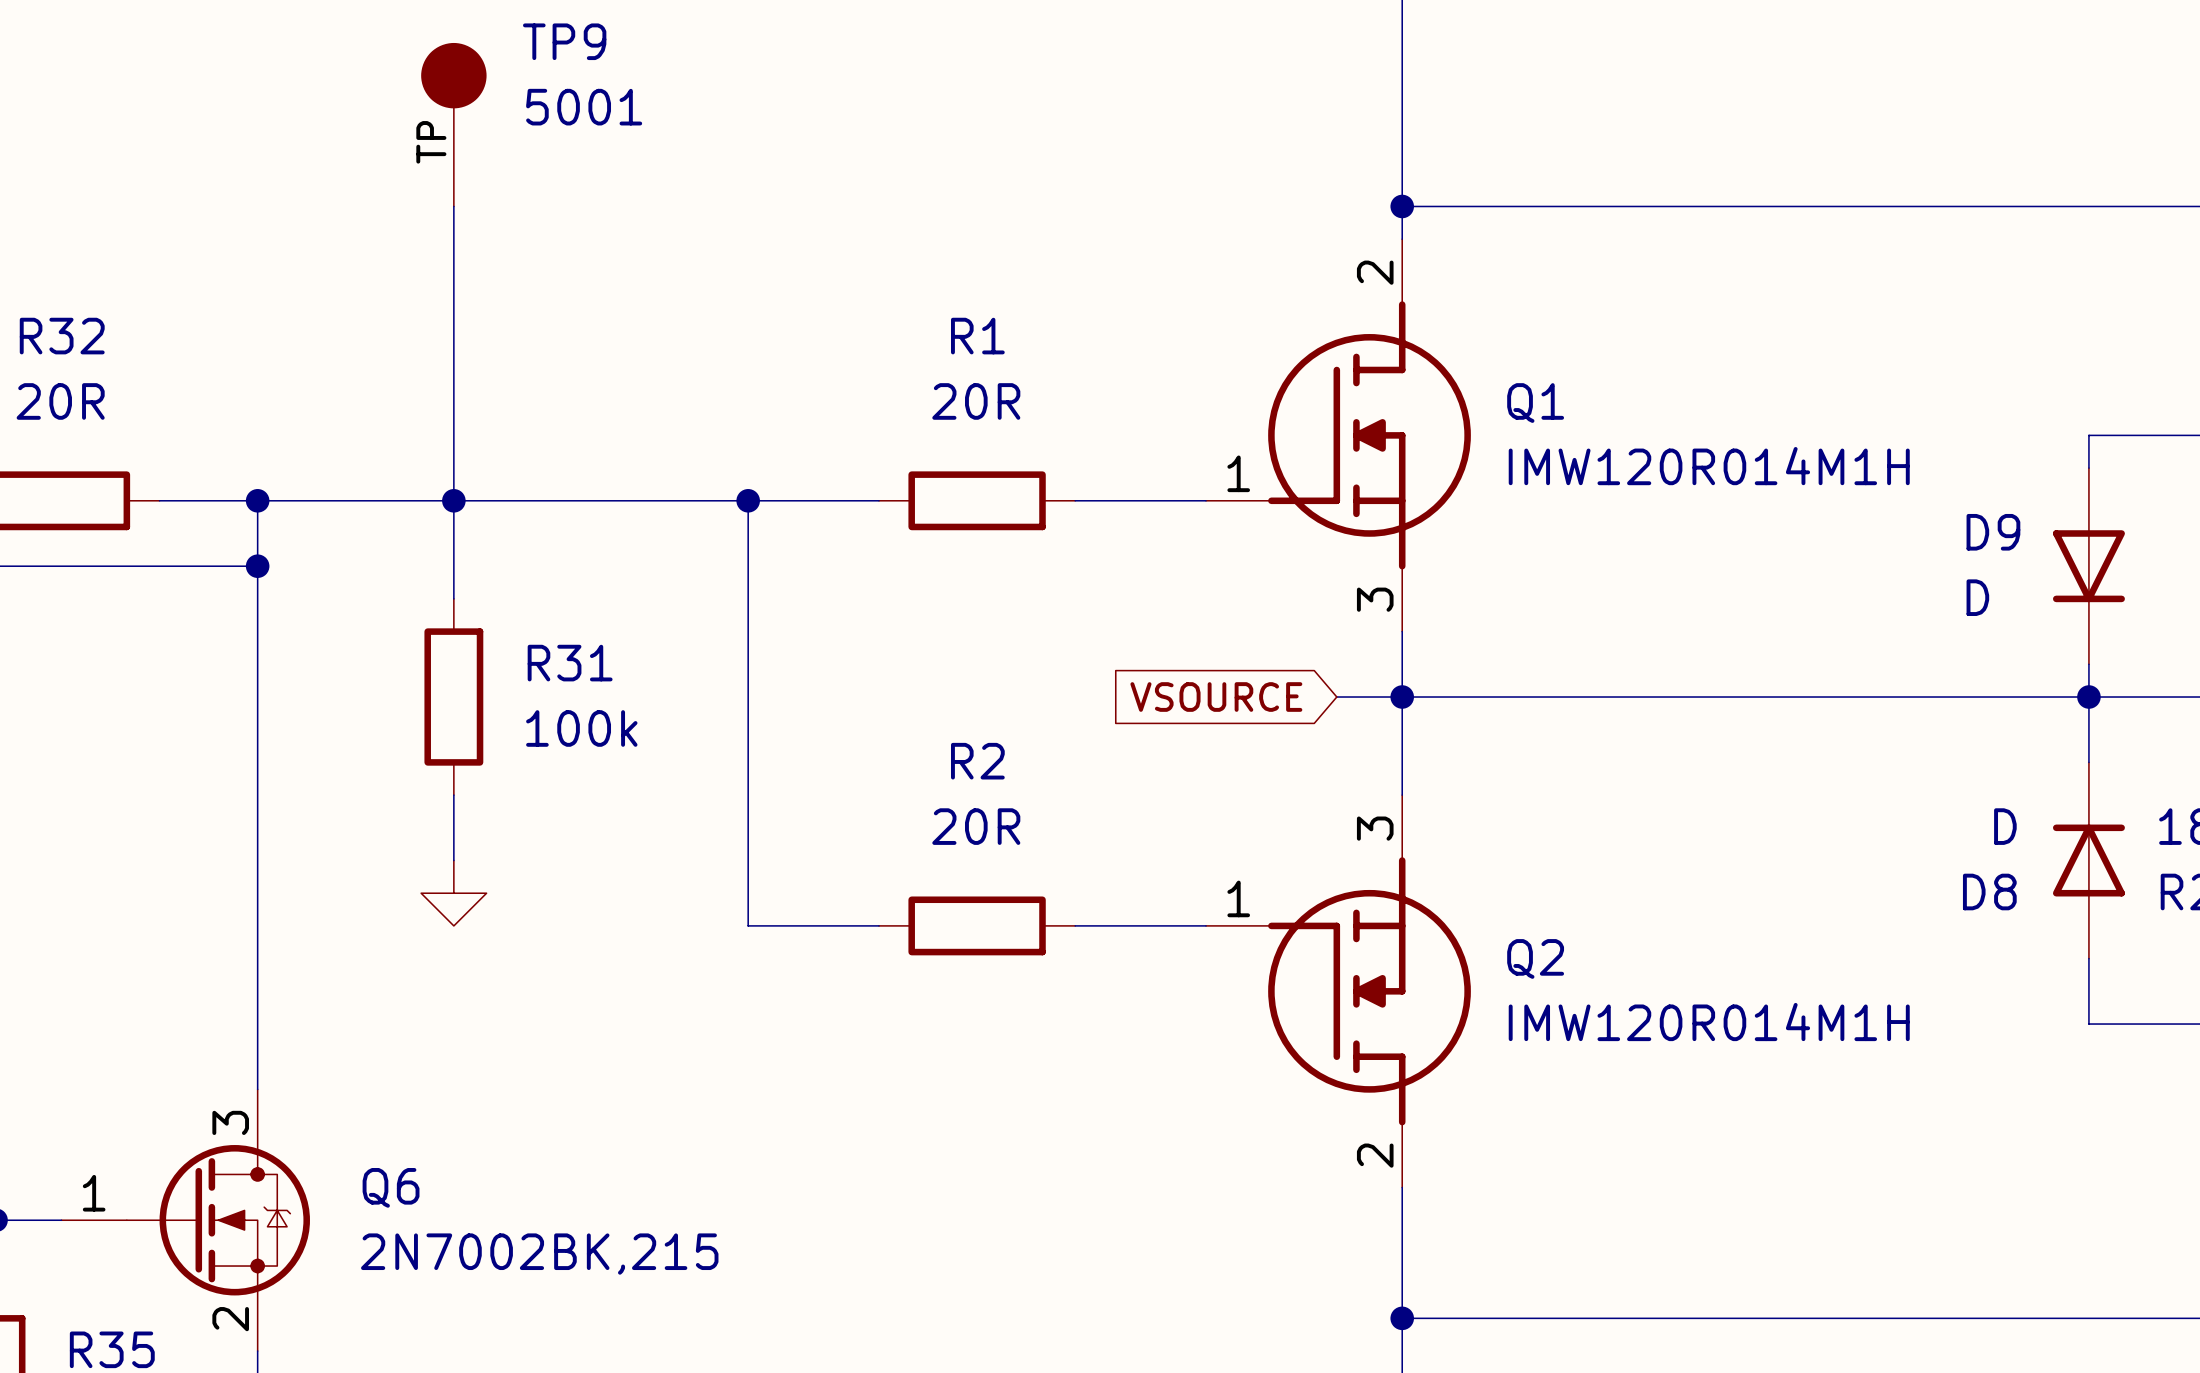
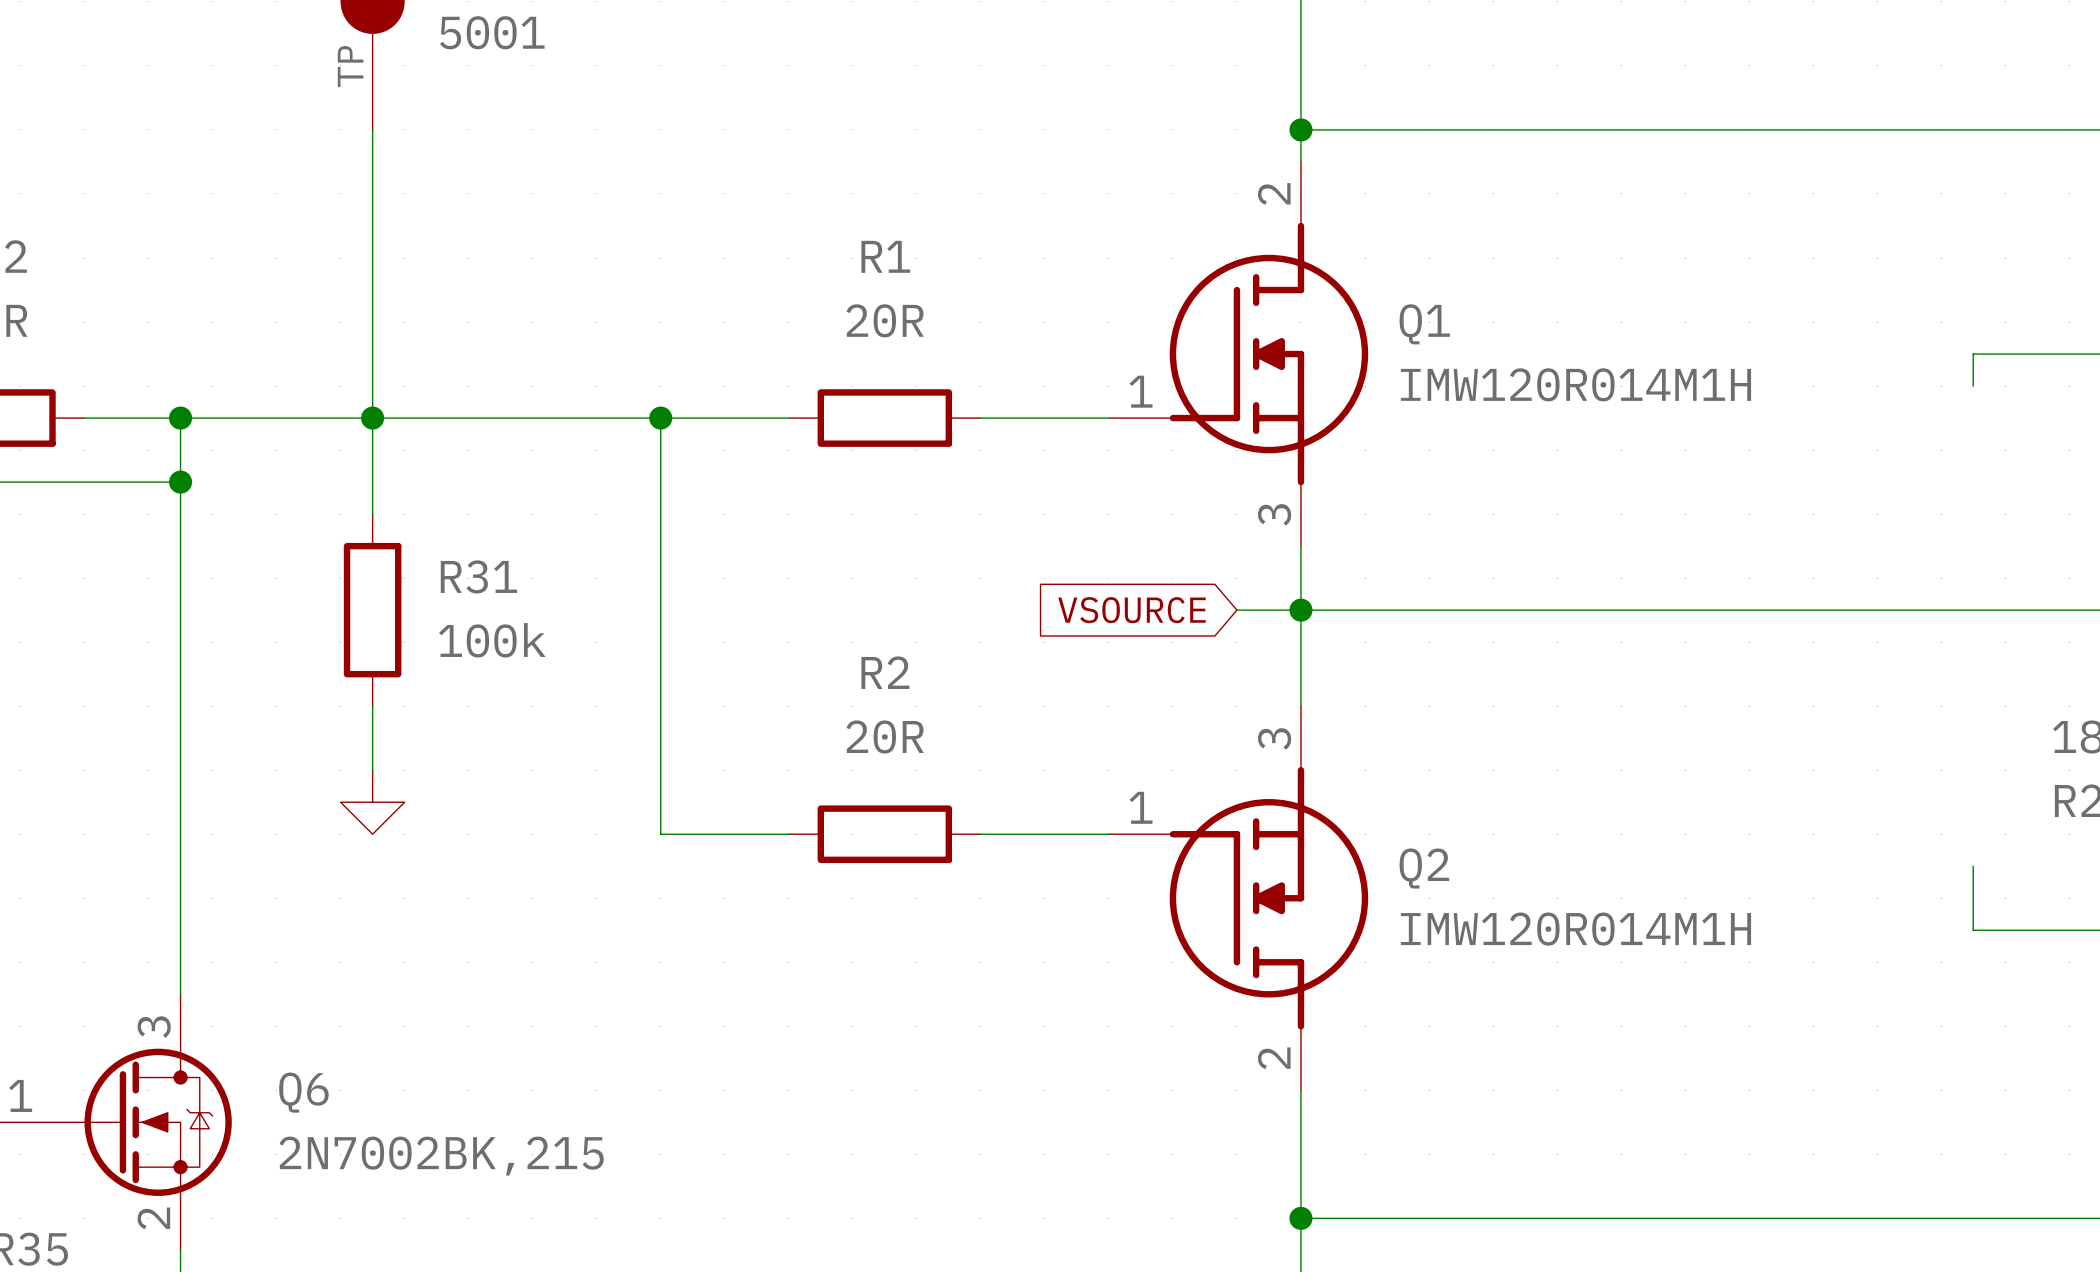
D9: D (2088, 566) -> none
wire: (2088, 664) (2088, 762) -> none
junction: (2088, 697) -> none
D8: D (2088, 860) -> none

